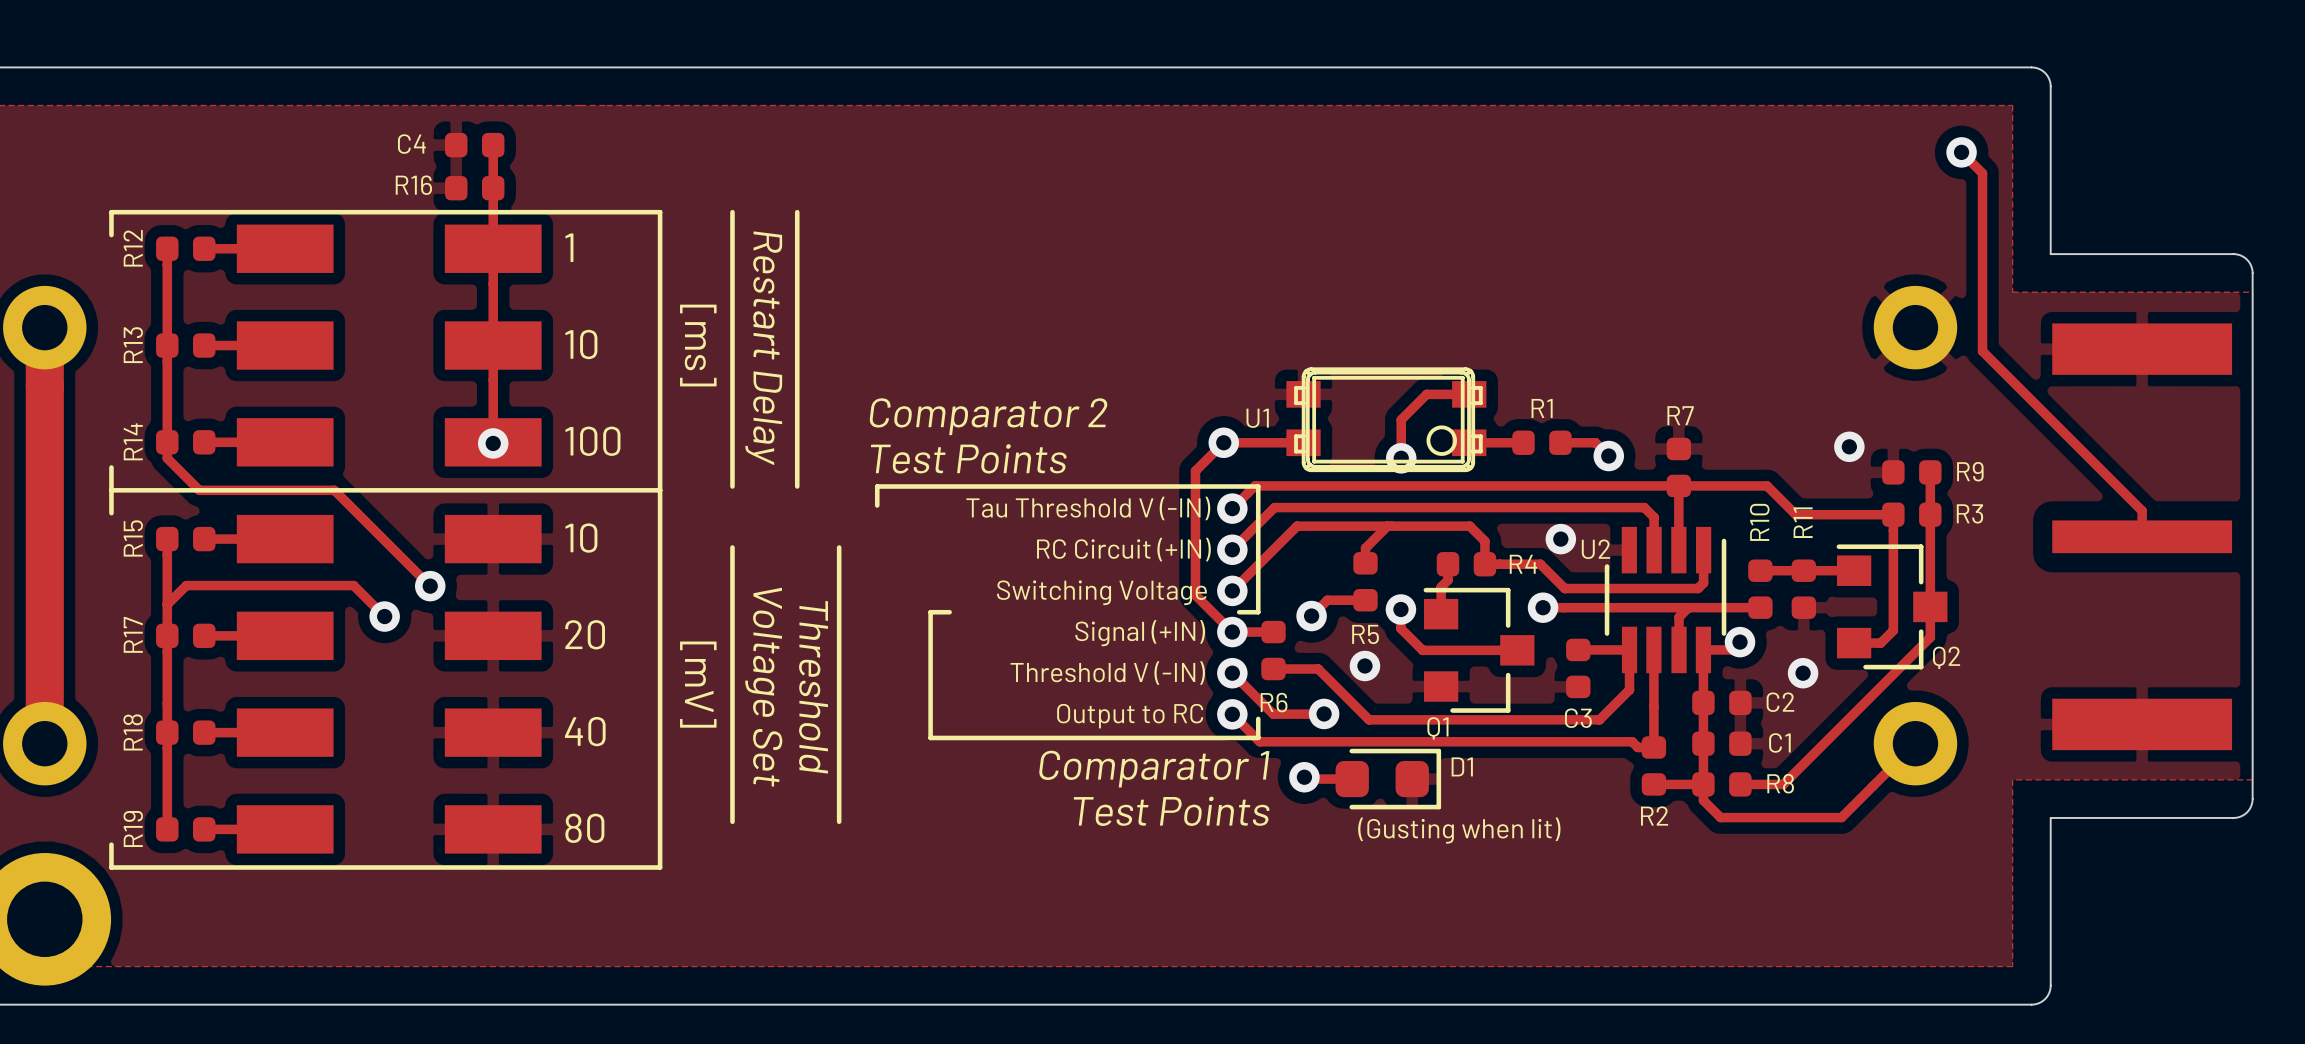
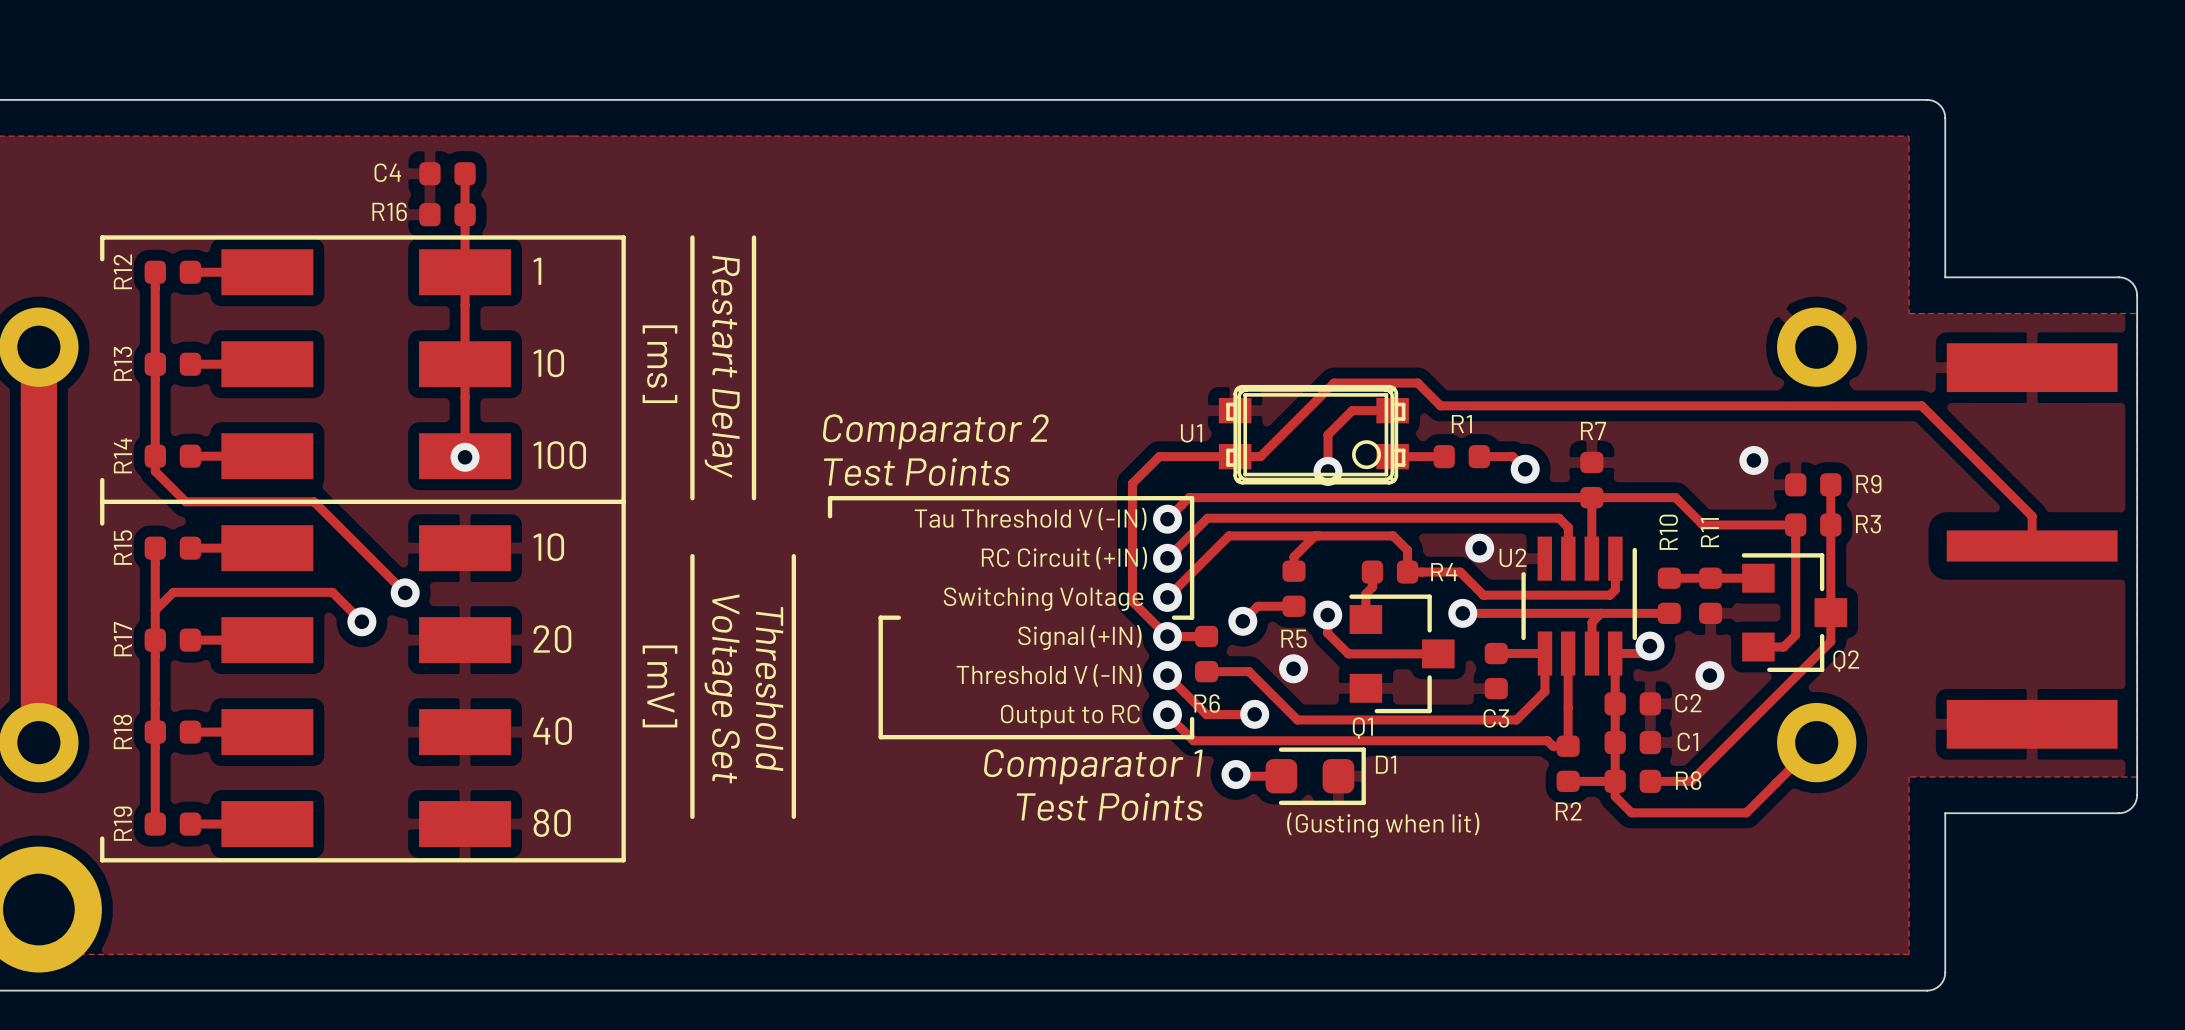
track: (1961, 152) (1982, 173) (1982, 351) (2142, 510) -> (1235, 456) (1260, 456) (1334, 383) (1417, 383) (1440, 405) (1921, 405) (2032, 516) (2032, 521)
via: (1961, 152) -> none
via: (1223, 442) -> none

